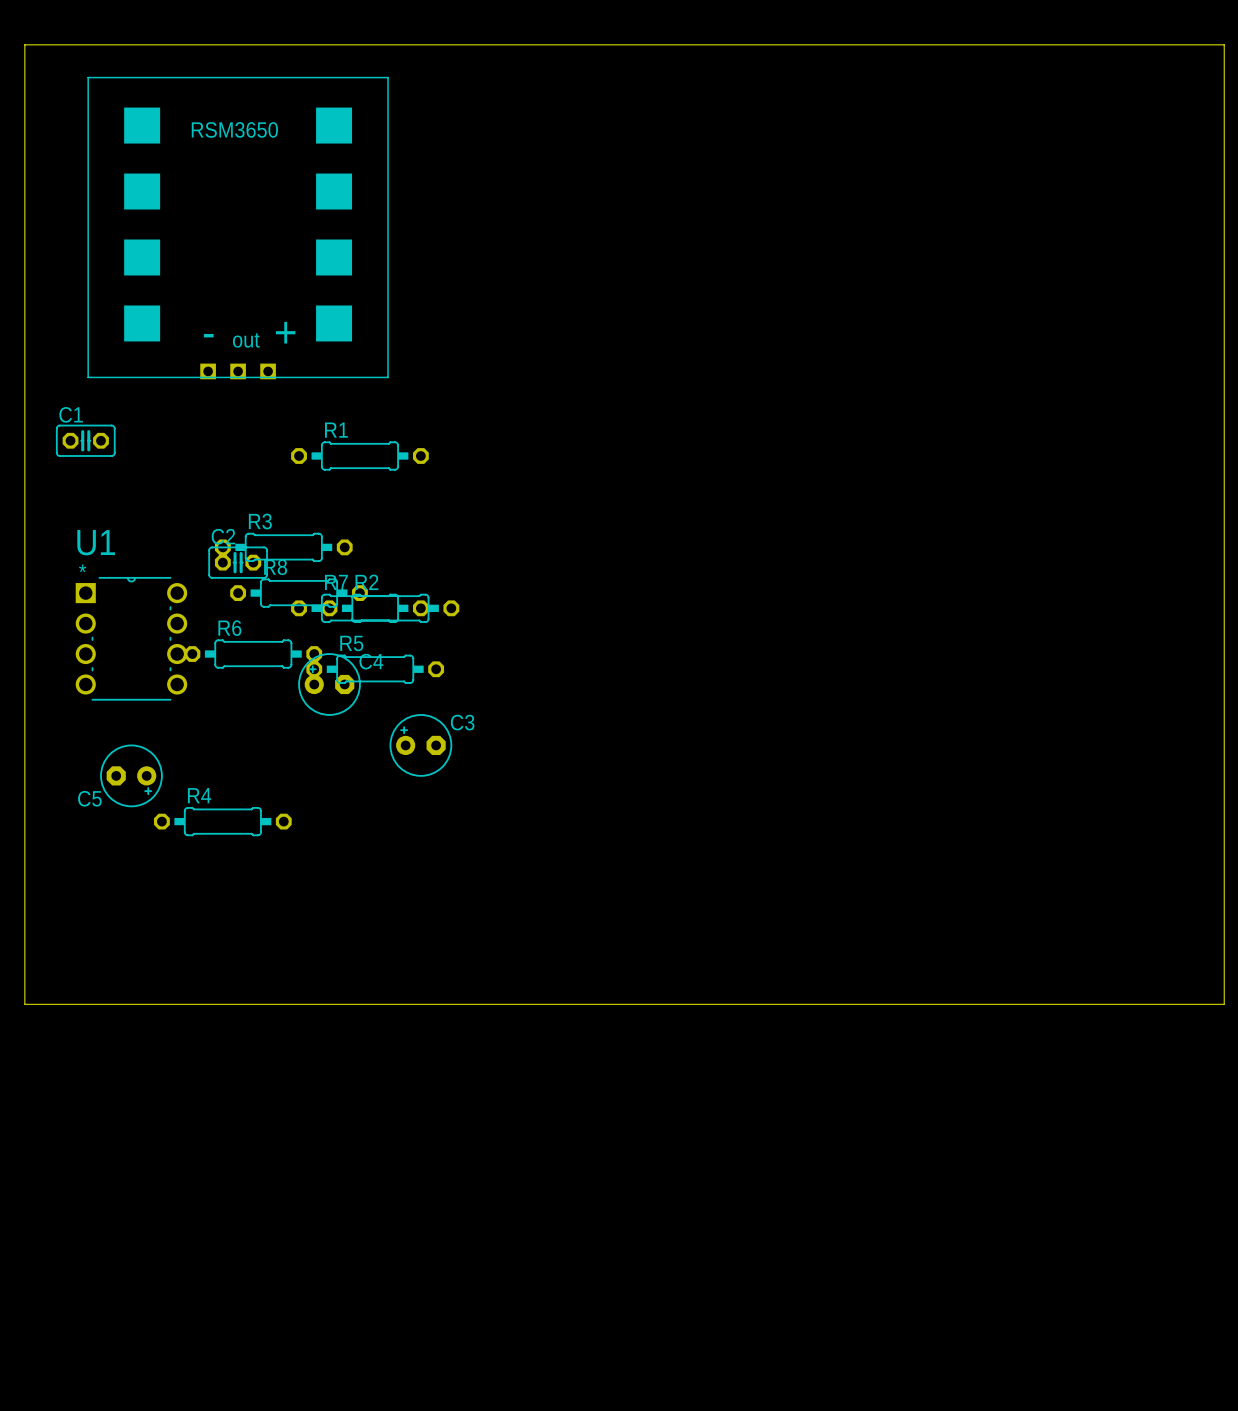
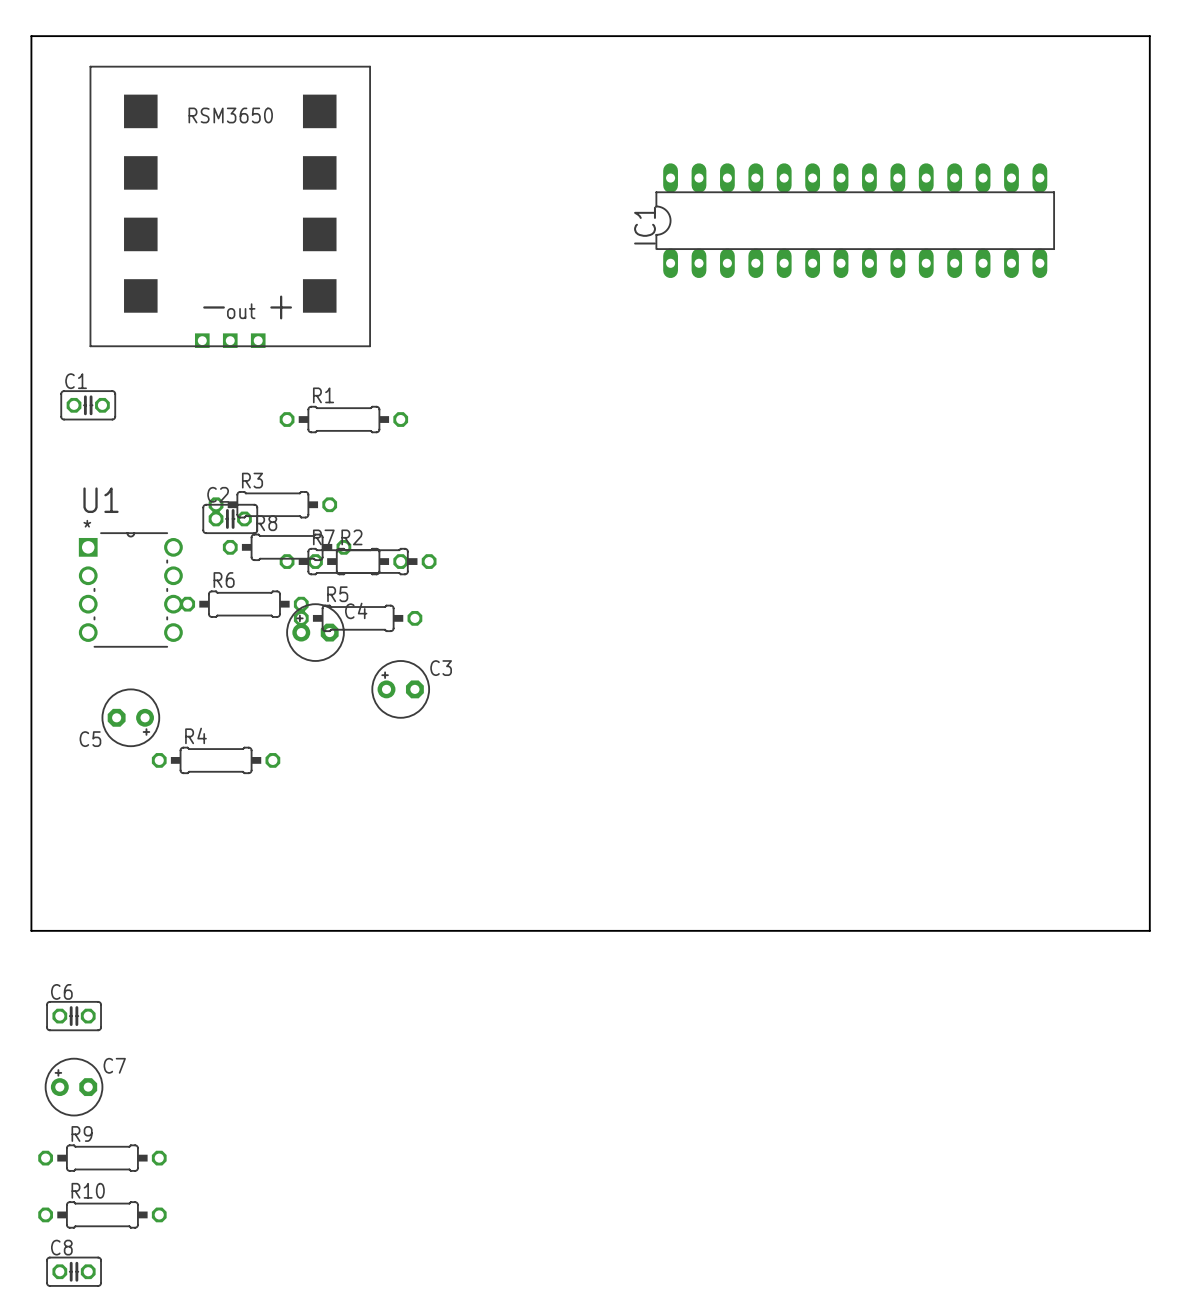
IC1: none -> (855, 220)
C6: none -> (74, 1016)
C7: none -> (74, 1087)
R9: none -> (102, 1158)
R10: none -> (102, 1214)
C8: none -> (74, 1271)

